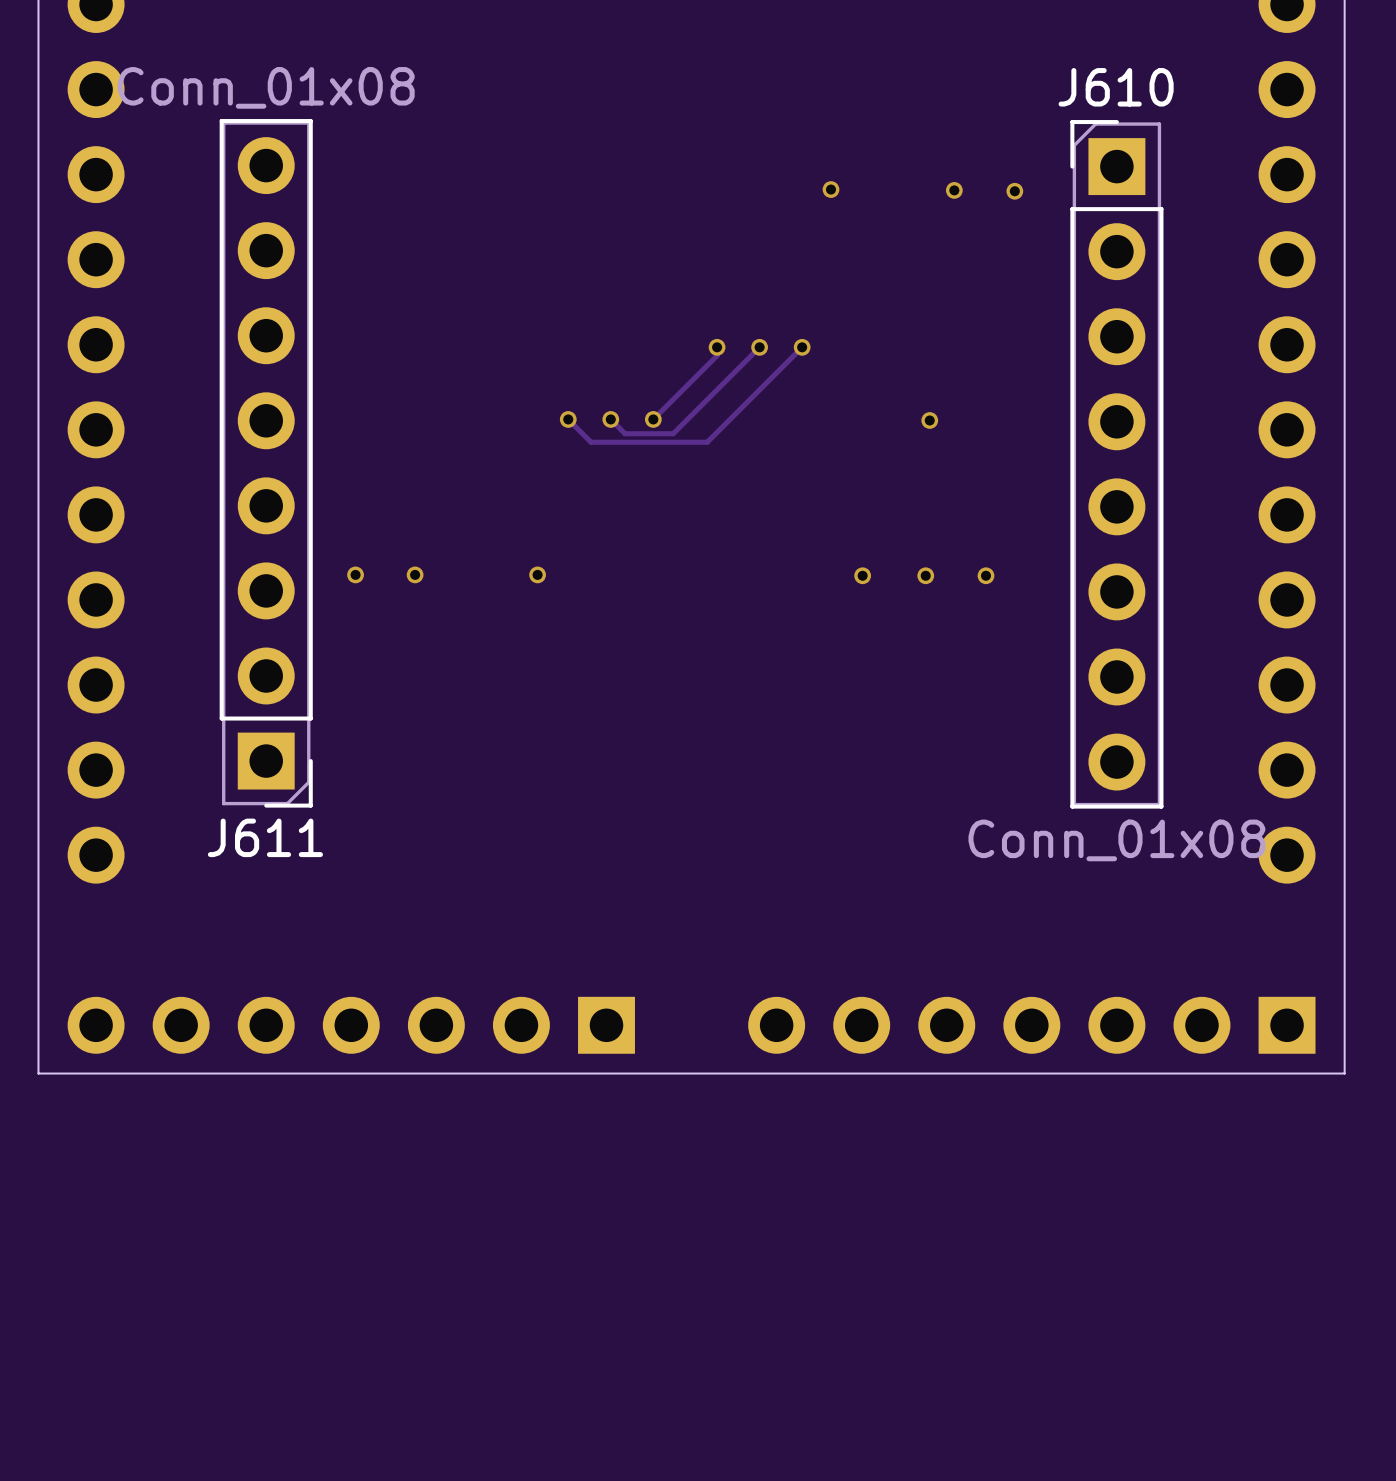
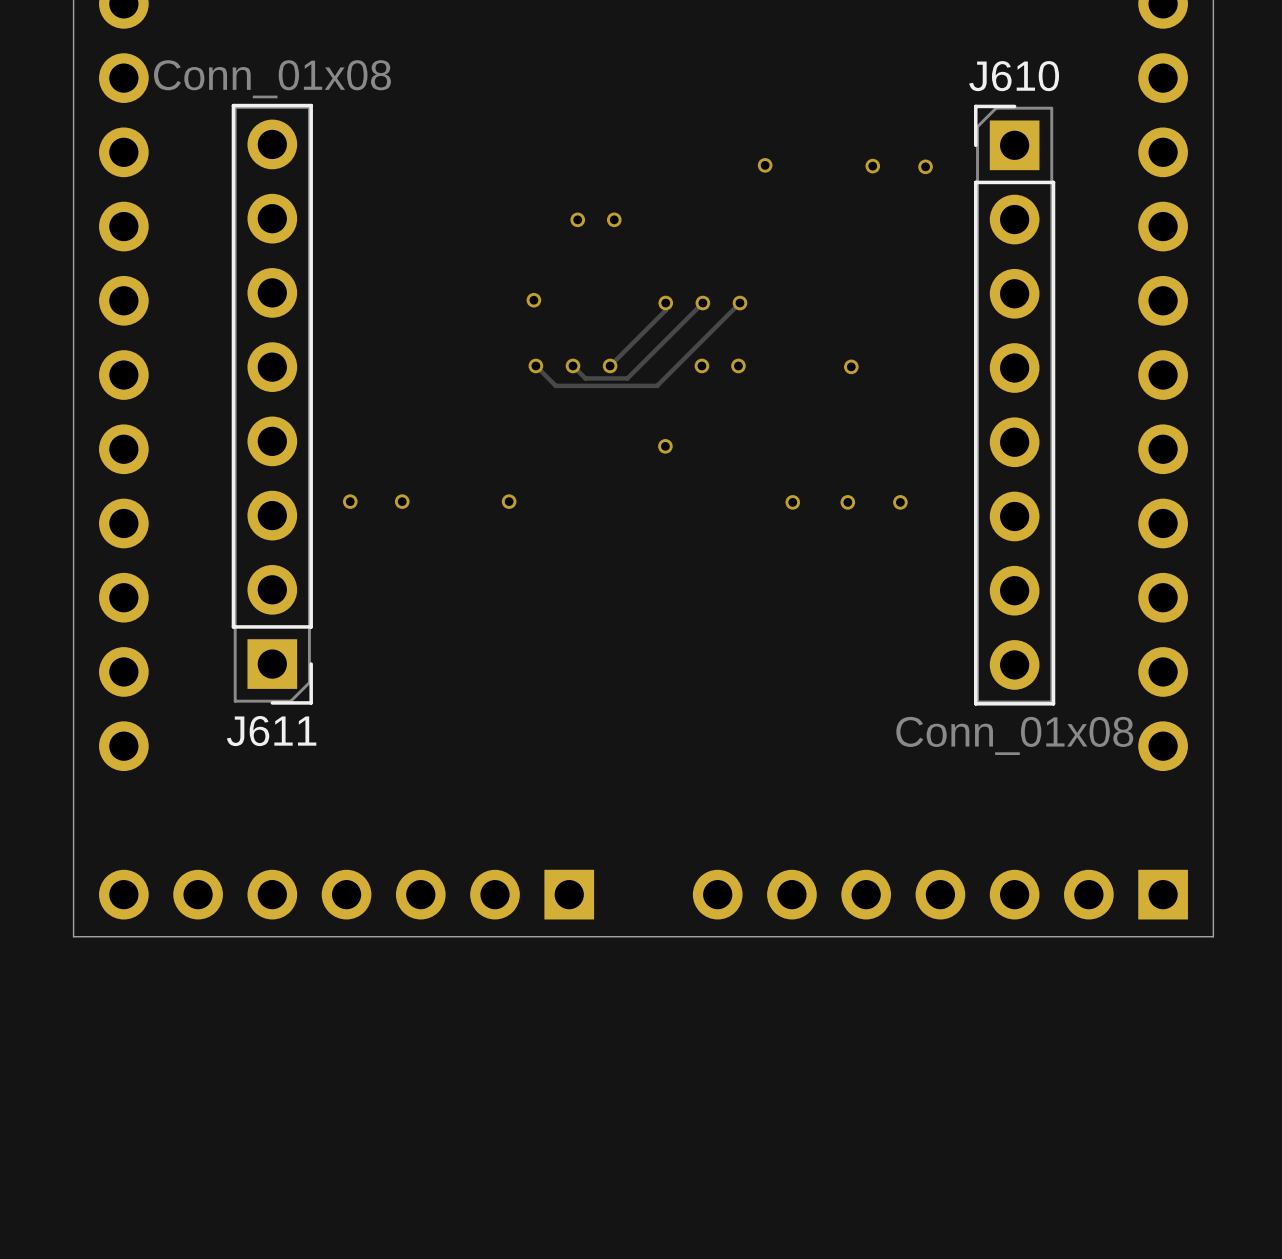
via: none -> (577, 219)
via: none -> (614, 219)
via: none -> (533, 300)
via: none -> (701, 365)
via: none -> (738, 365)
via: none -> (665, 446)

